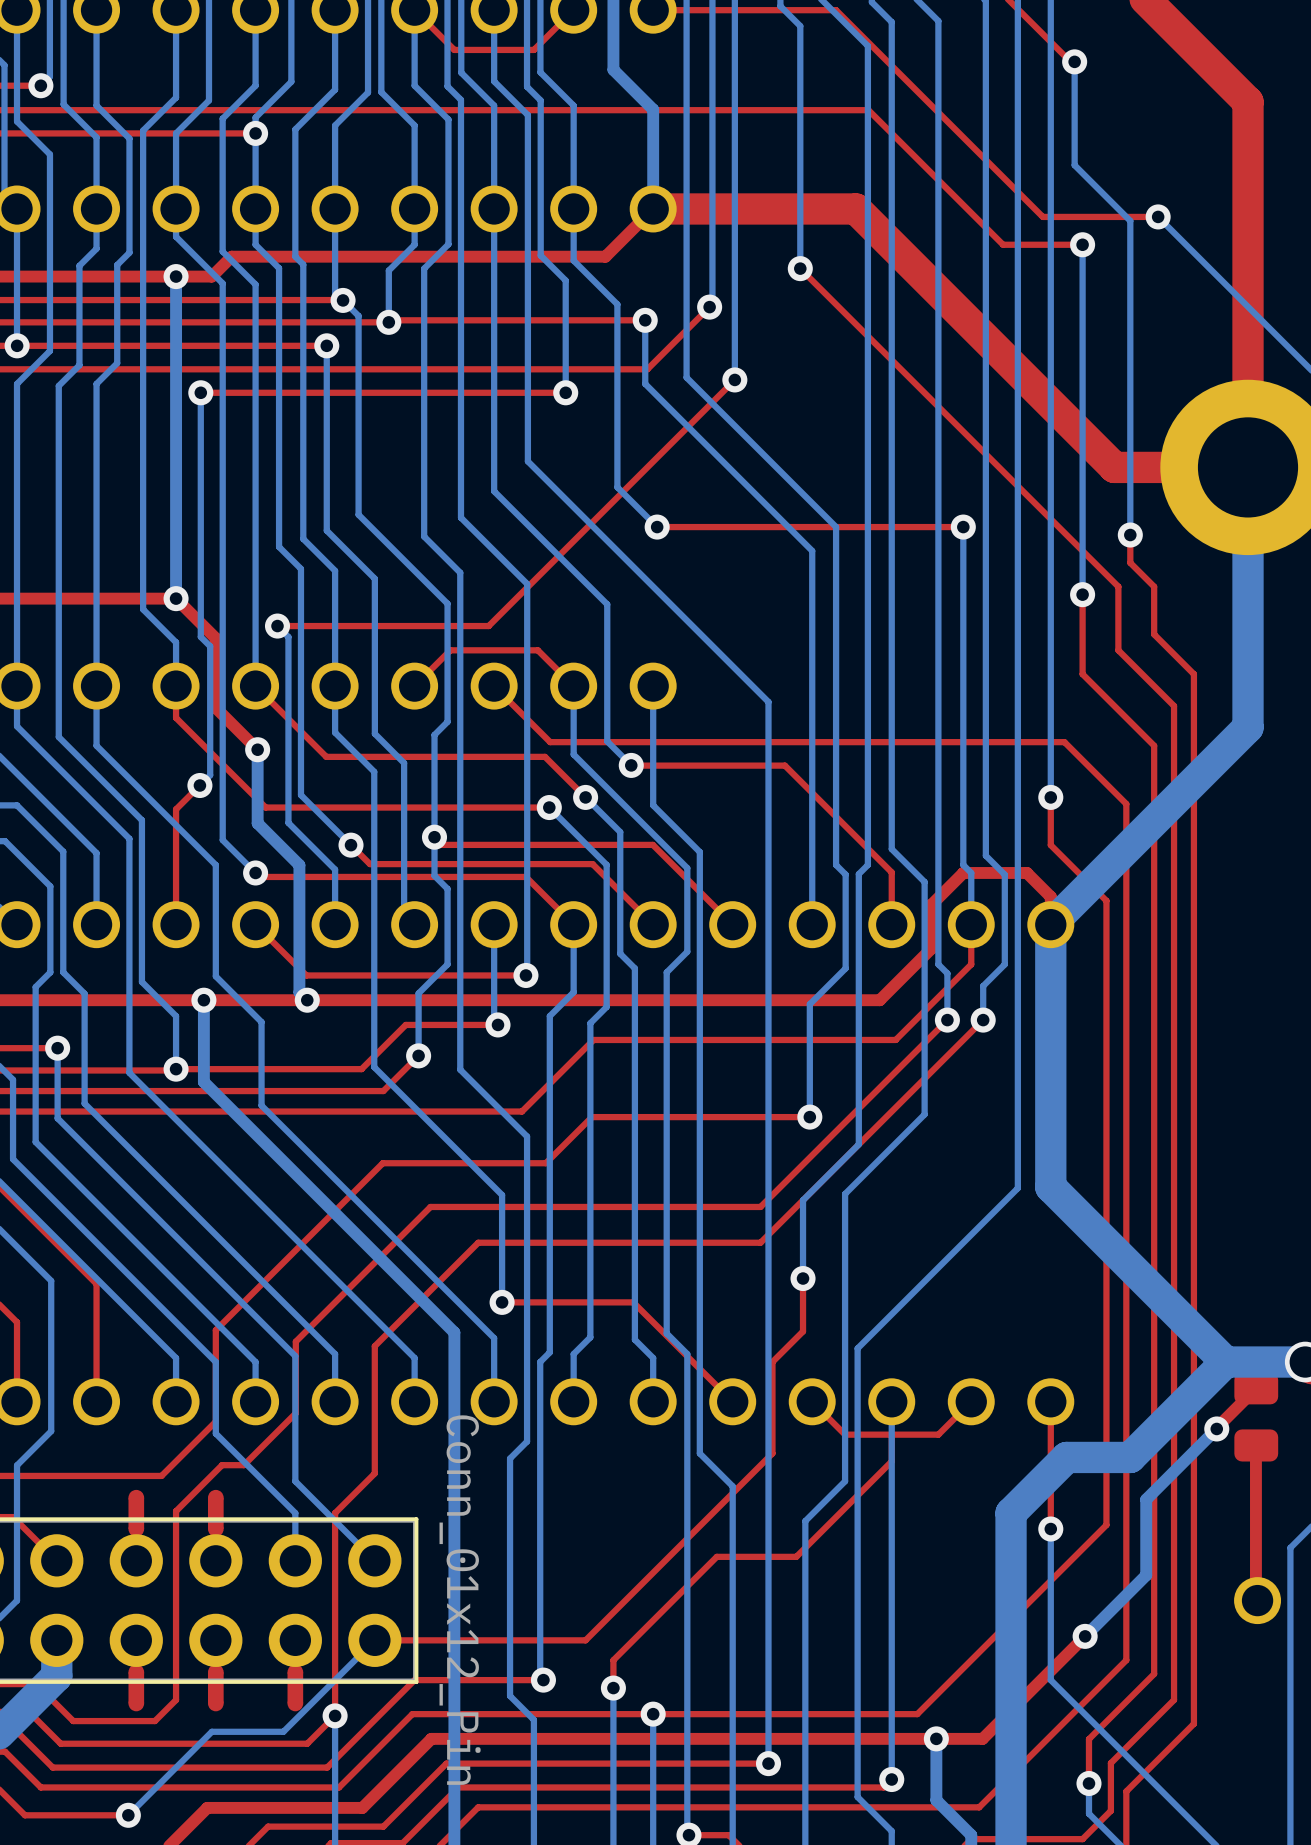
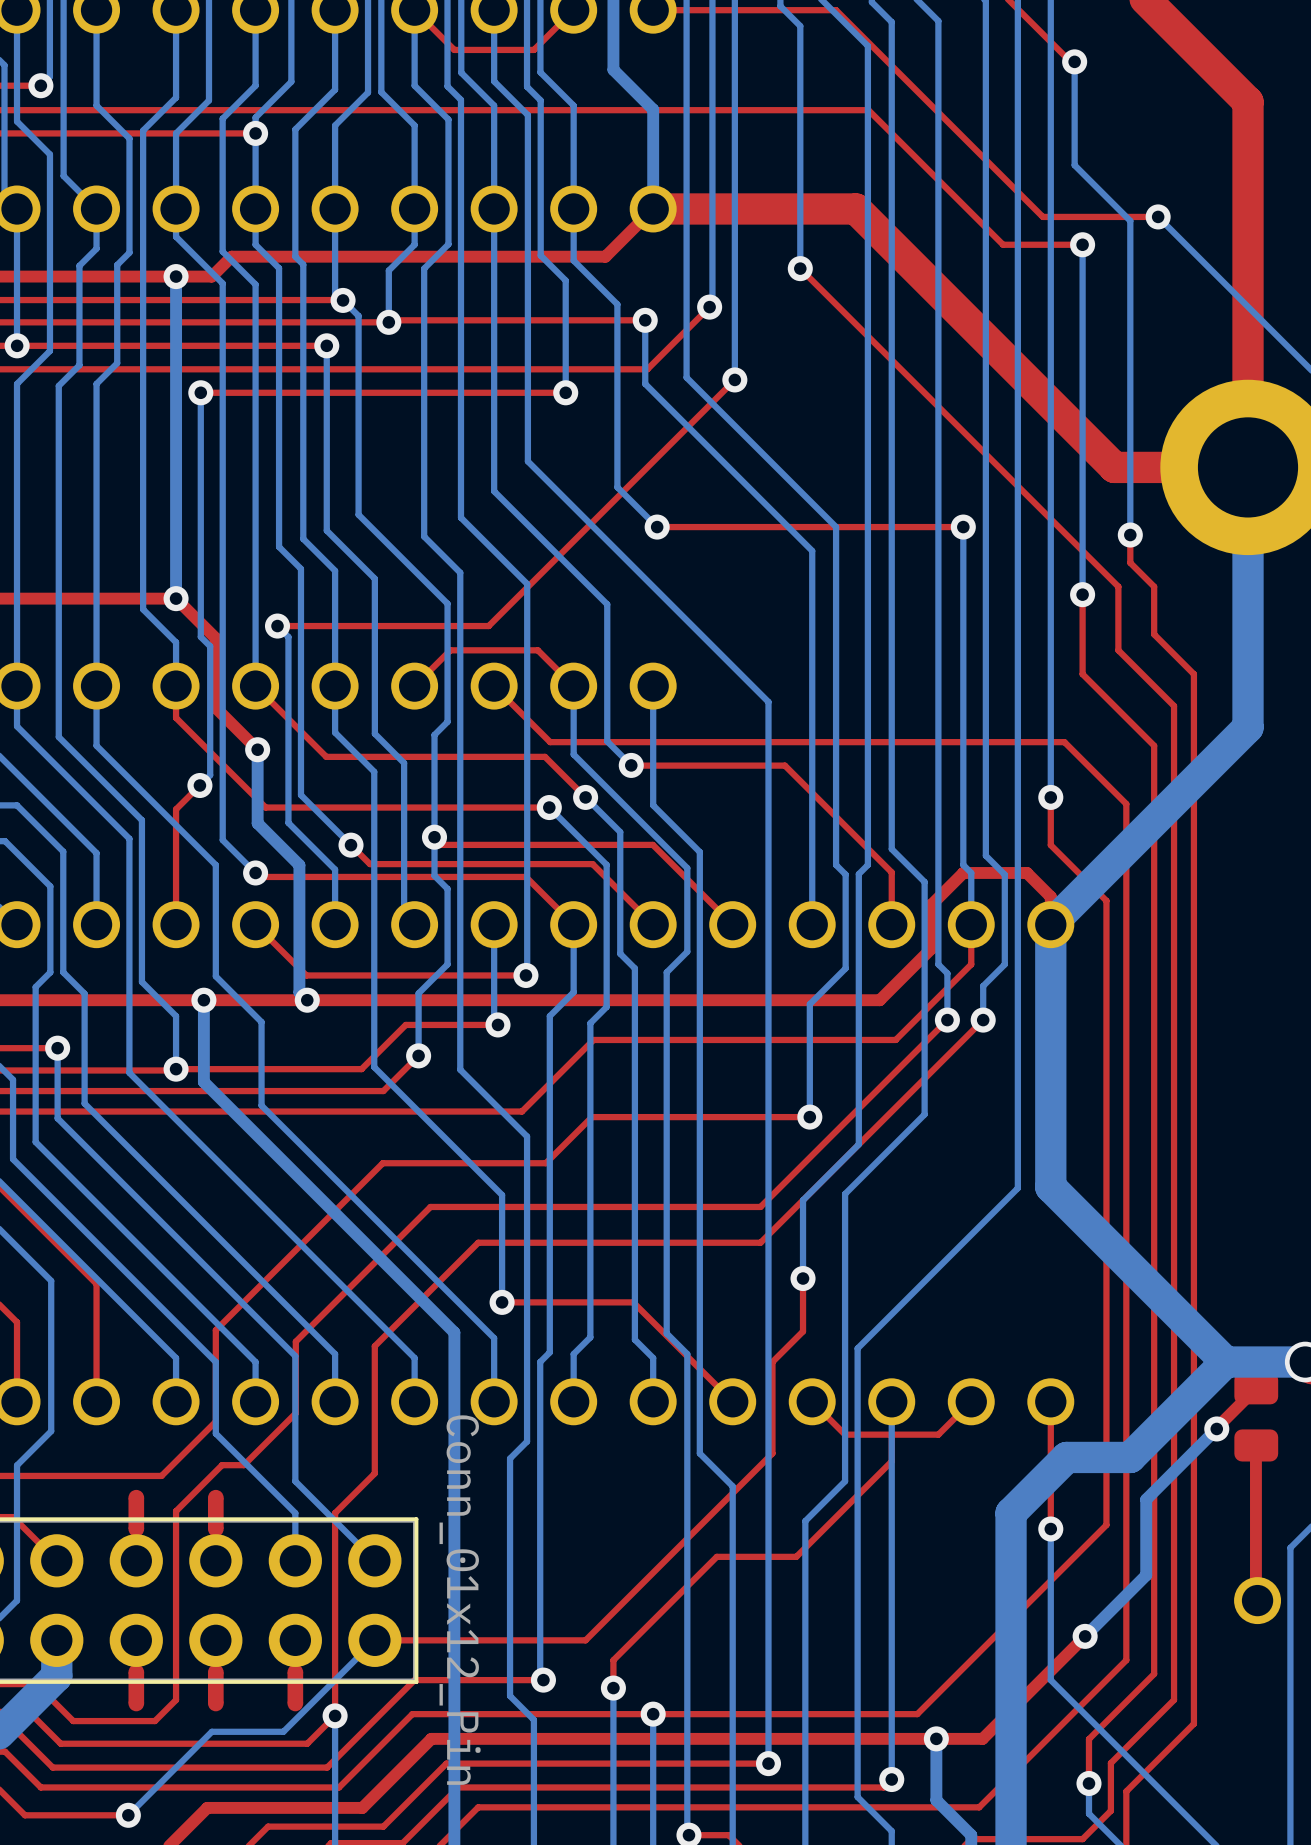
bottom track: (63, 104) (96, 137) (96, 208) -> (63, 104) (63, 176) (96, 208)

